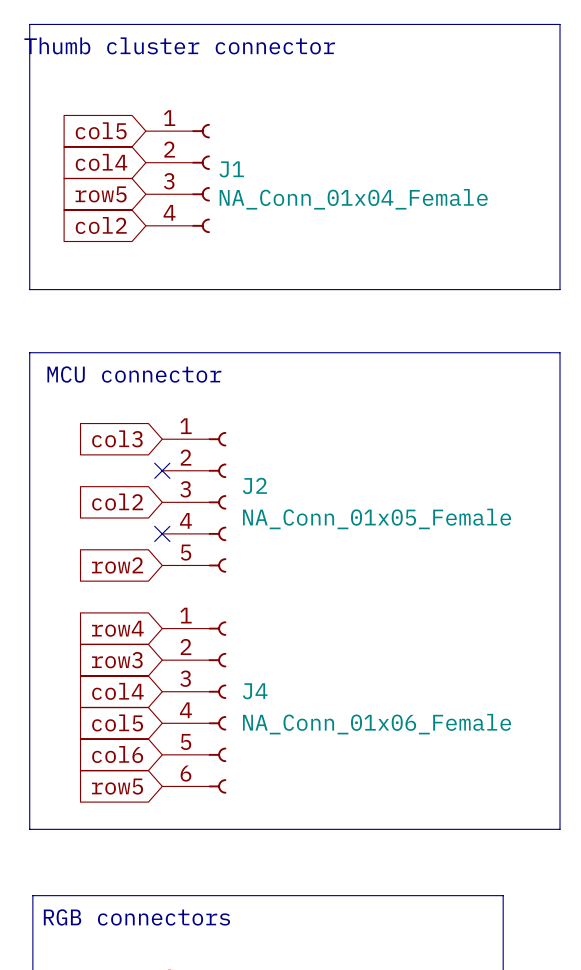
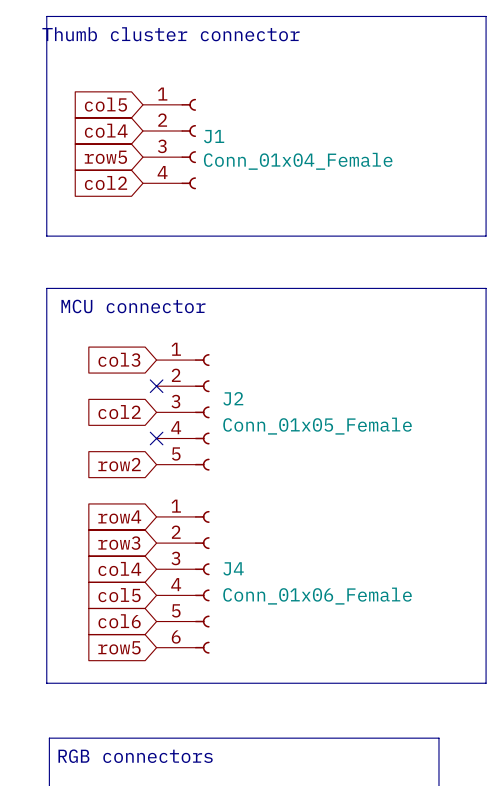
J1 value: NA_Conn_01x04_Female (353, 199) -> Conn_01x04_Female (298, 161)
J2 value: NA_Conn_01x05_Female (377, 518) -> Conn_01x05_Female (317, 426)
J4 value: NA_Conn_01x06_Female (377, 724) -> Conn_01x06_Female (317, 596)

